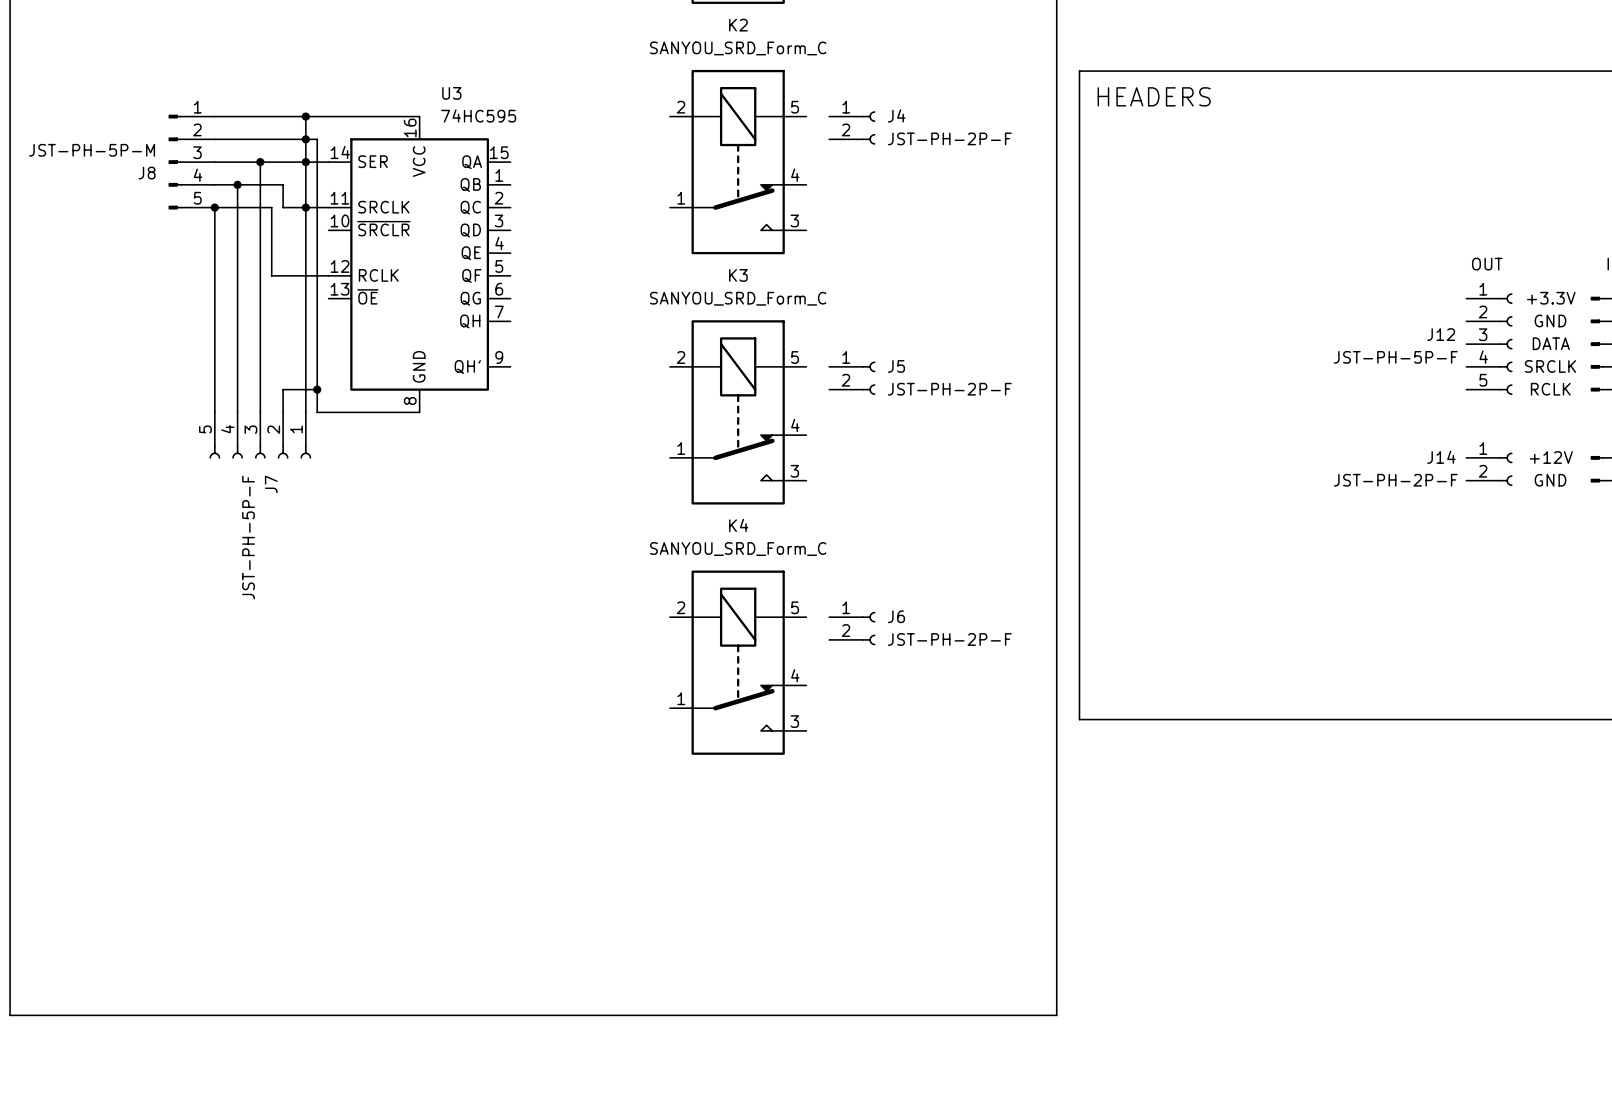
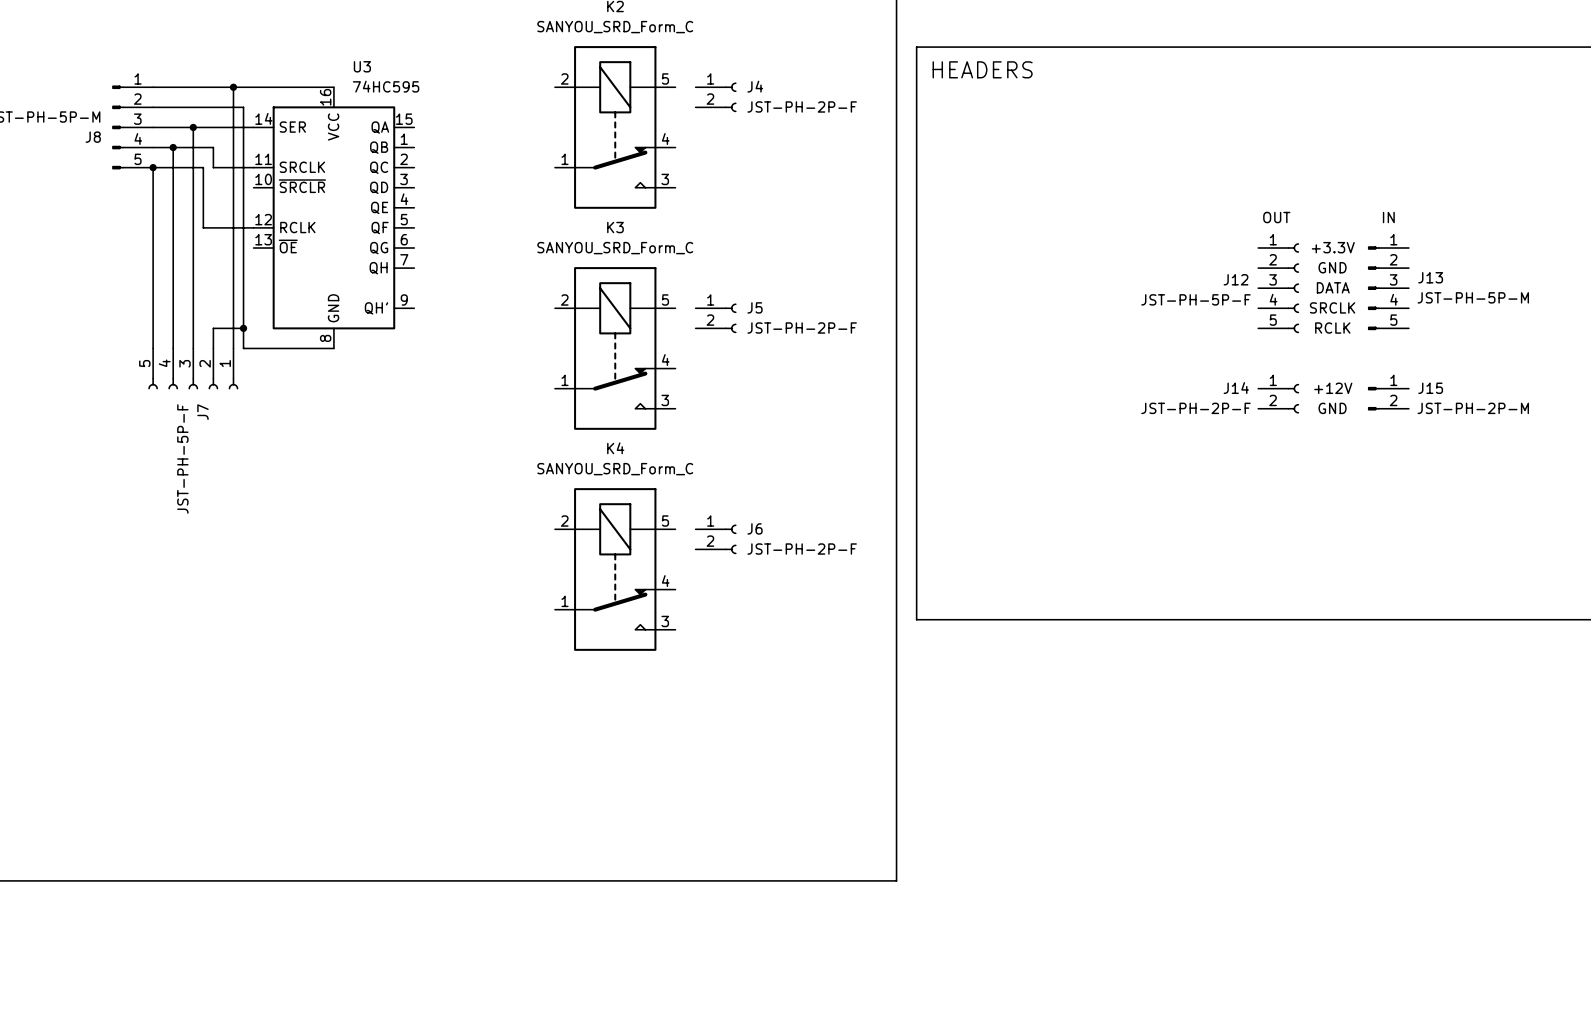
junction: (305, 139) -> none
junction: (305, 162) -> none
junction: (305, 207) -> none

